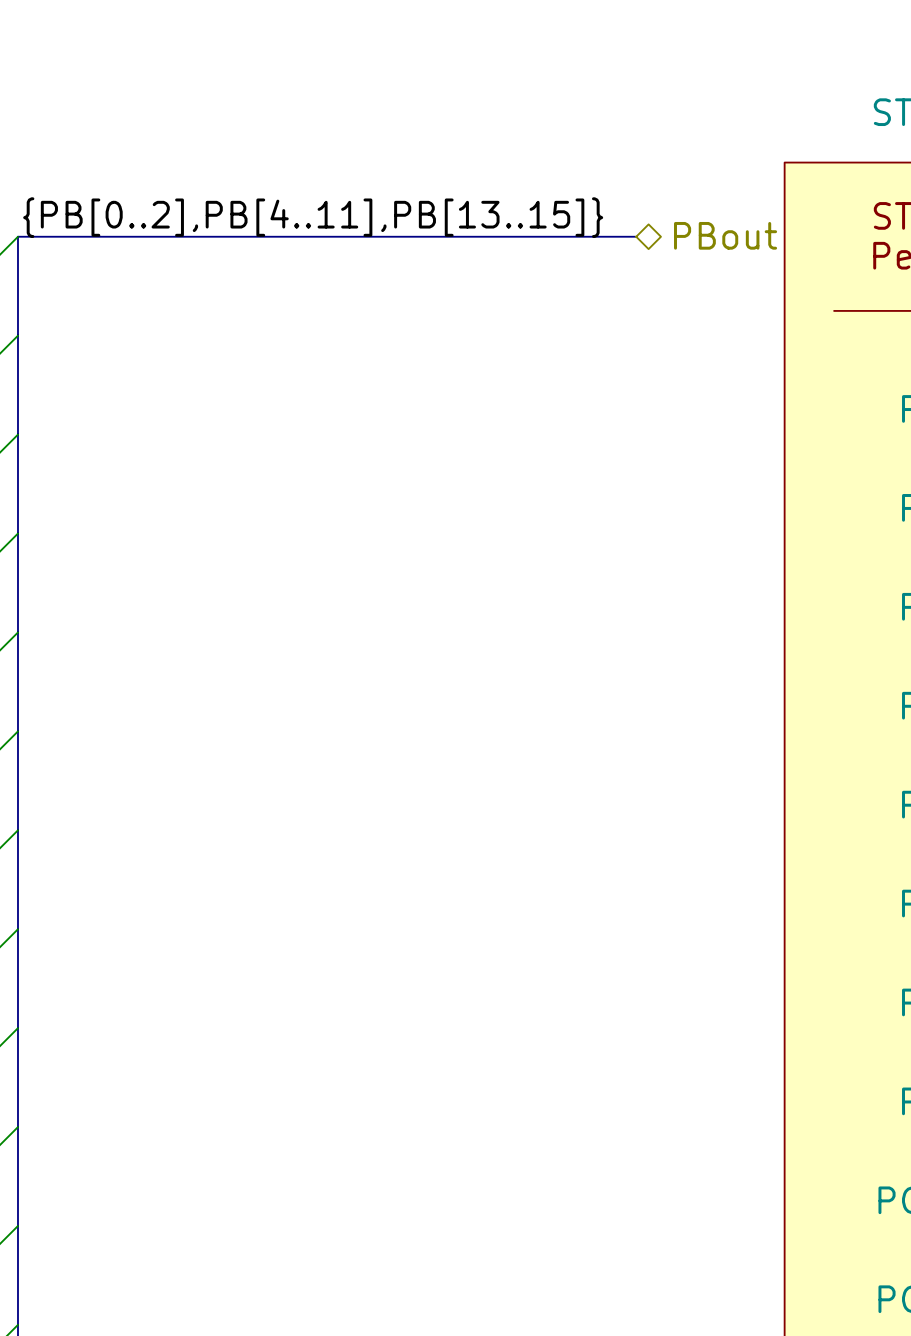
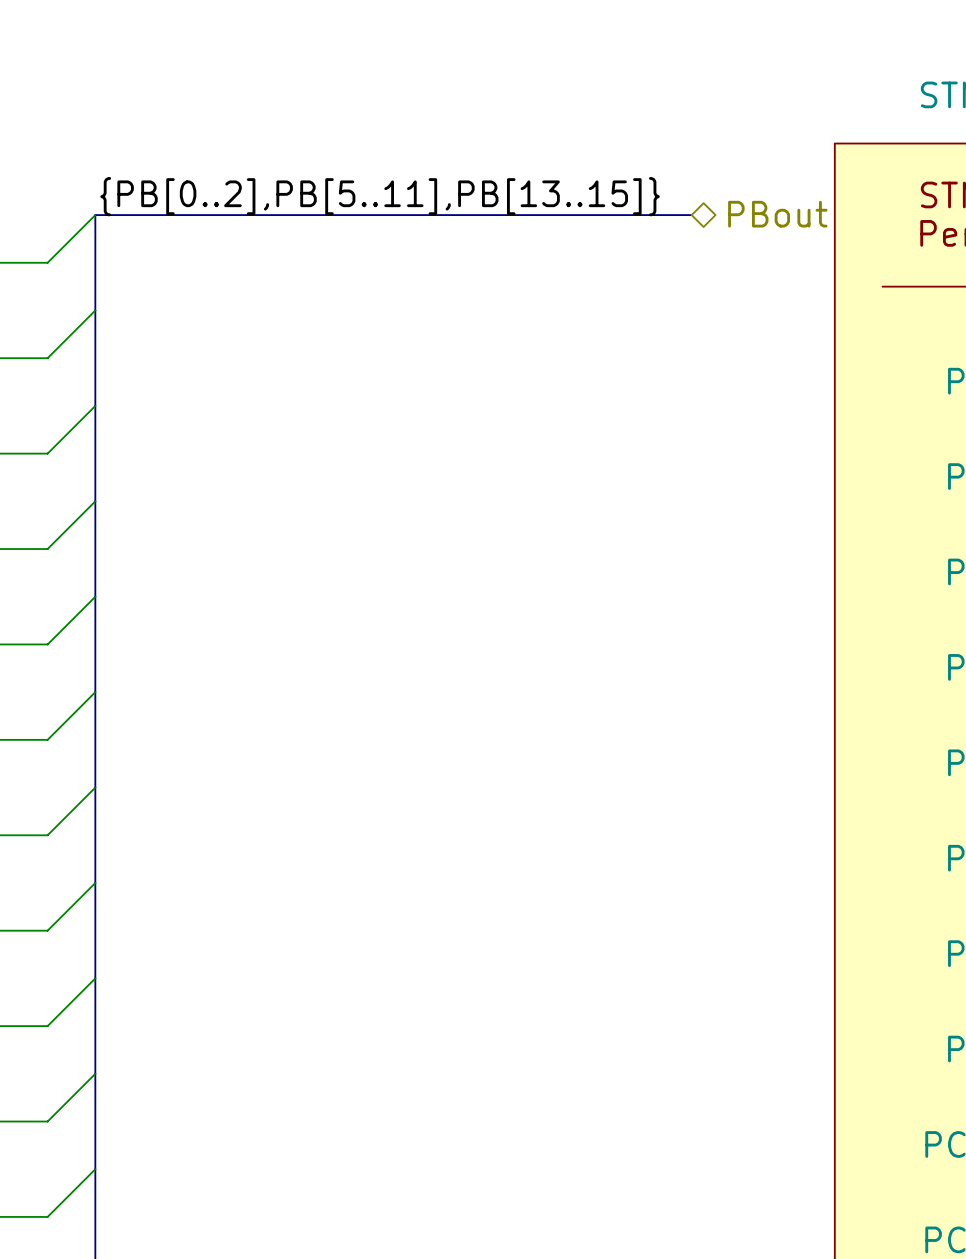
label: {PB[0..2],PB[4..11],PB[13..15]} (313, 217) -> {PB[0..2],PB[5..11],PB[13..15]} (380, 196)

